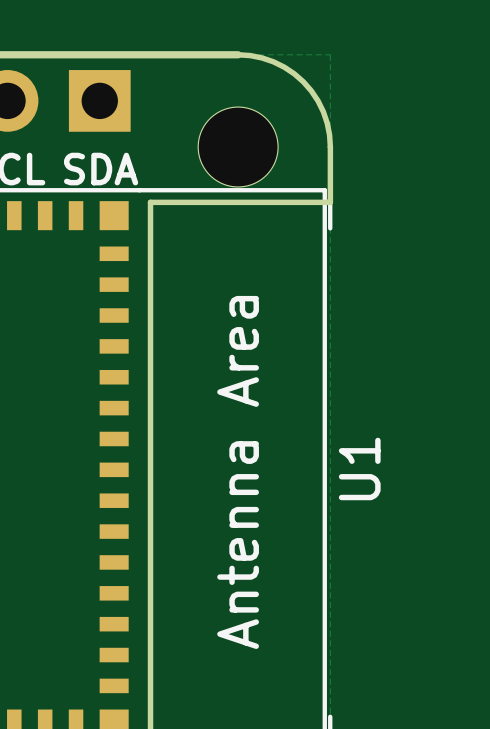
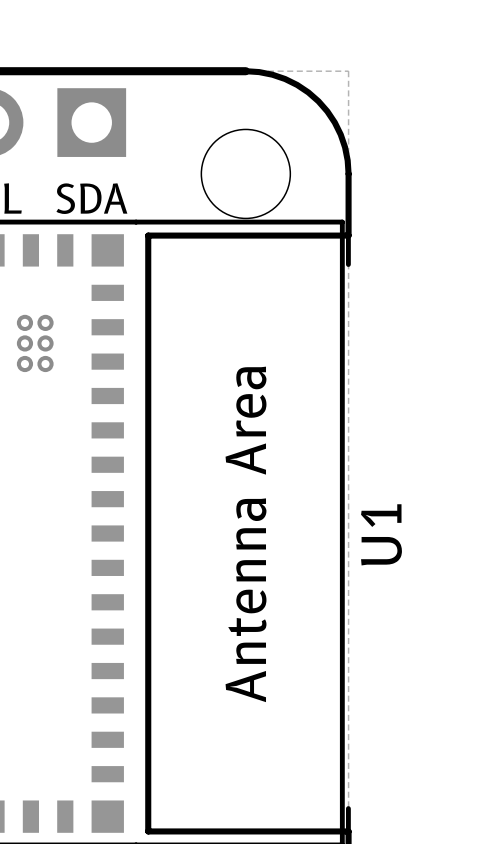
via: none -> (24, 322)
via: none -> (45, 322)
via: none -> (24, 343)
via: none -> (45, 343)
via: none -> (24, 364)
via: none -> (45, 364)

